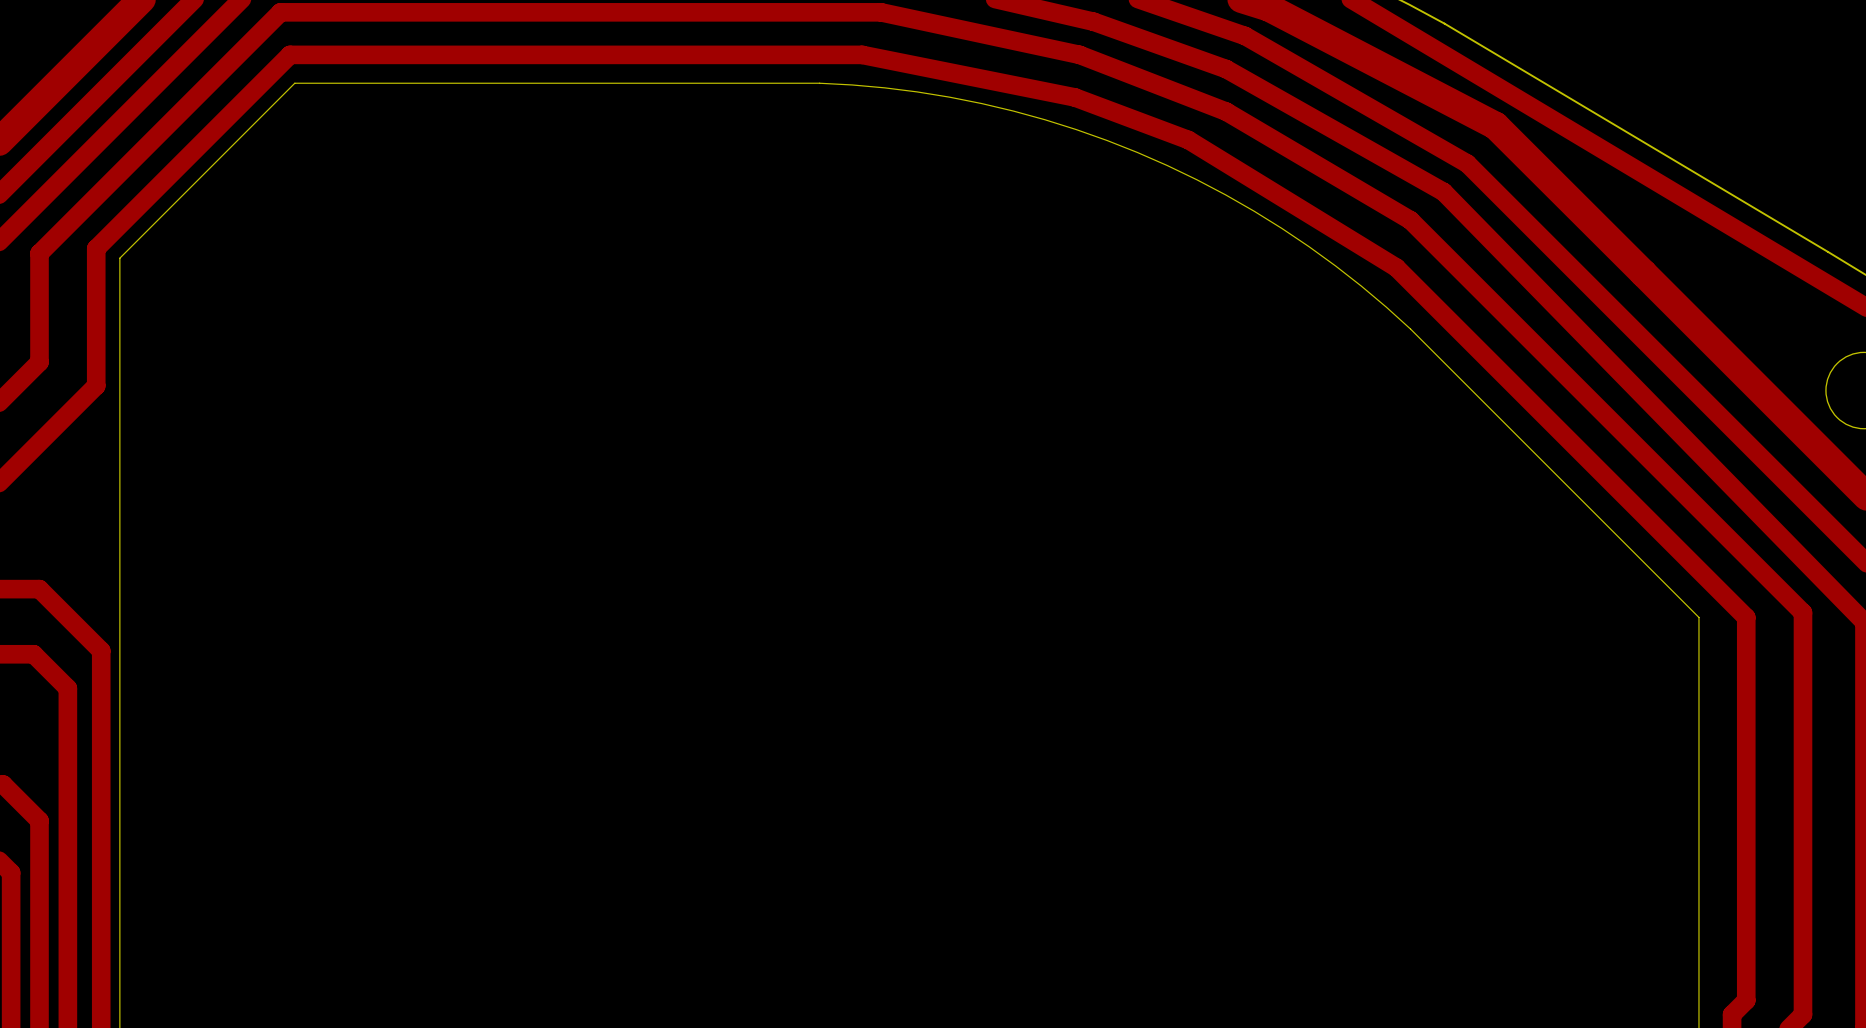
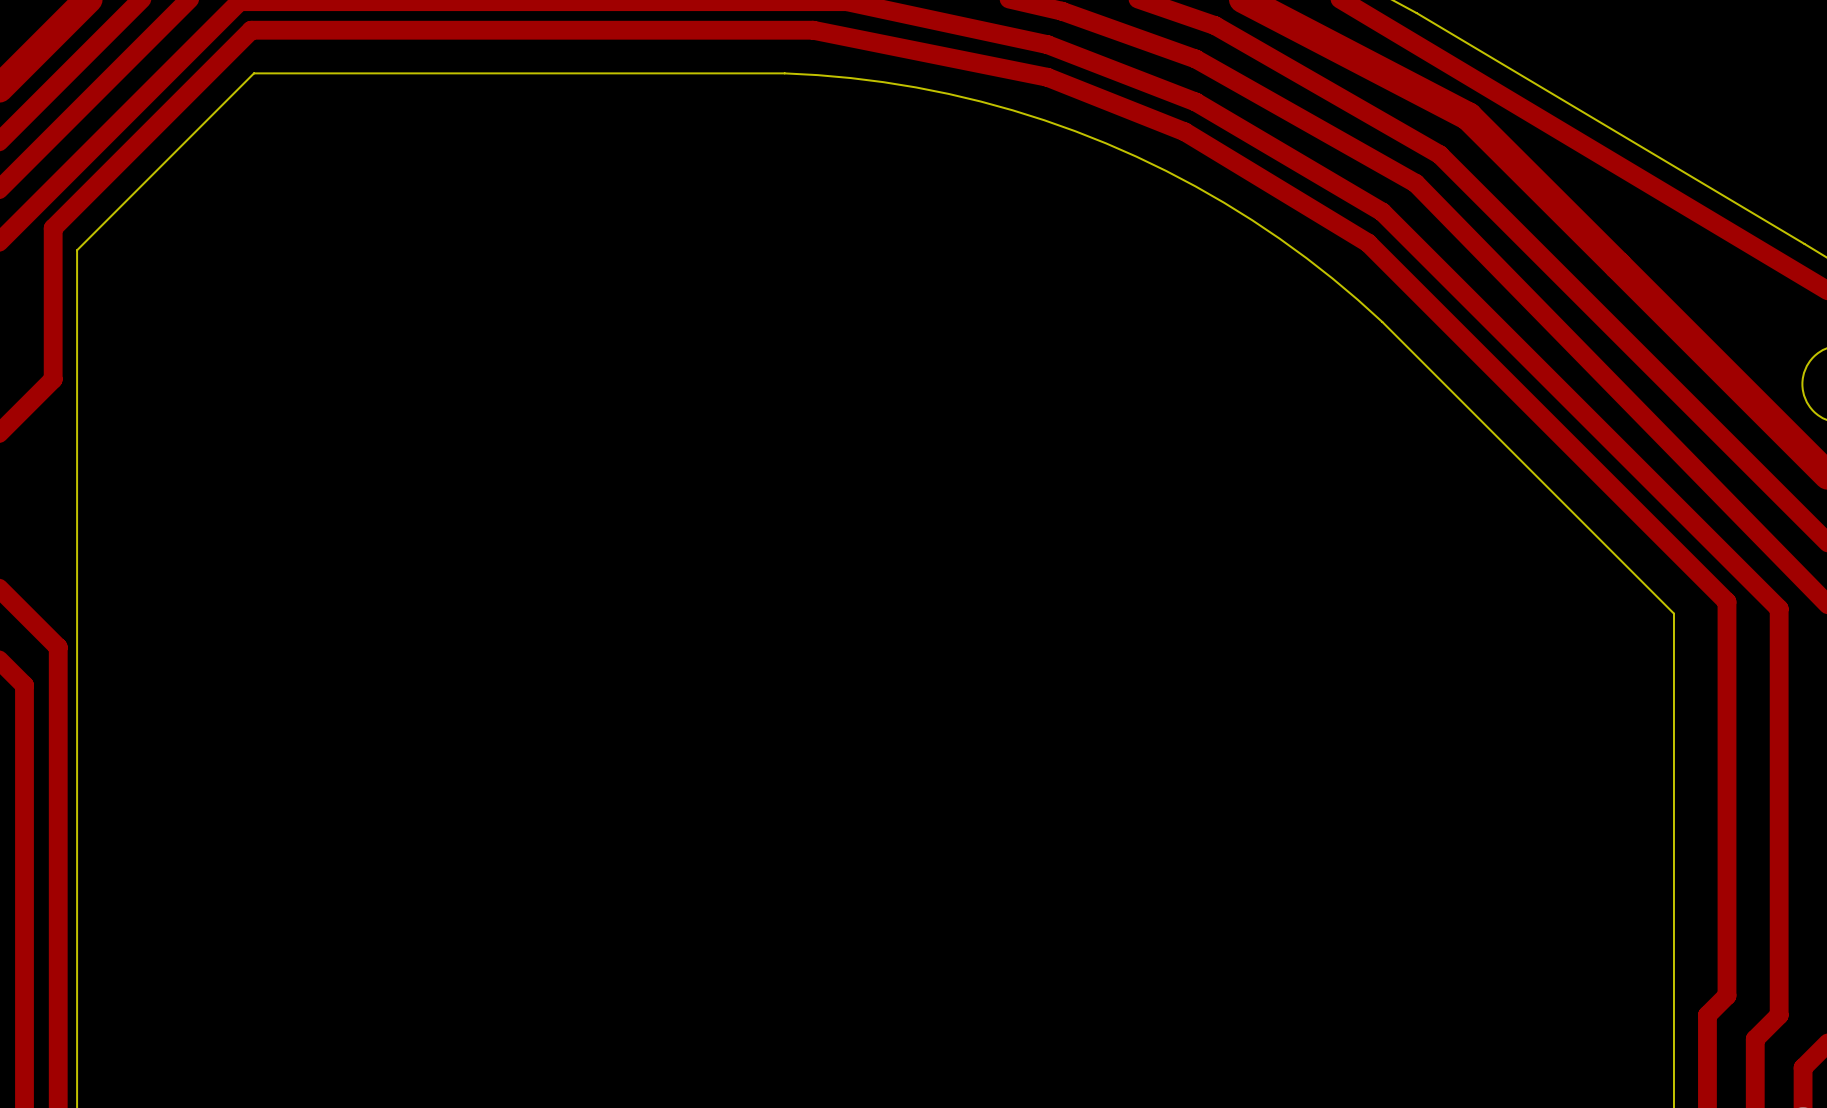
top track: (96, 248) (290, 54) (862, 54) (1074, 97) (1188, 139) (1396, 267) (1746, 617) (1746, 1000) -> (53, 240) (53, 228) (251, 30) (813, 30) (1047, 77) (1184, 131) (1367, 242) (1726, 601) (1726, 995) (1721, 1000)

